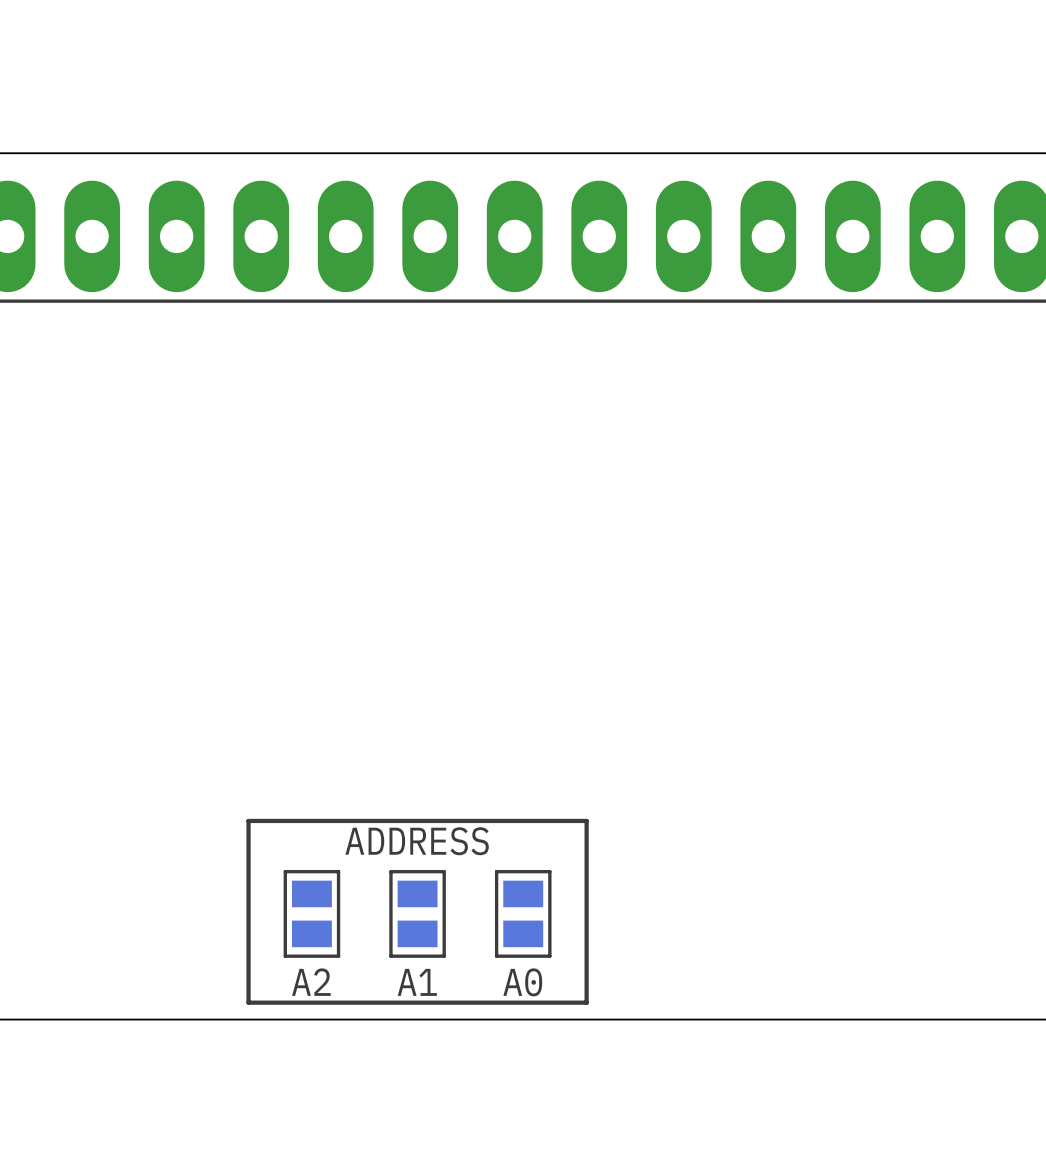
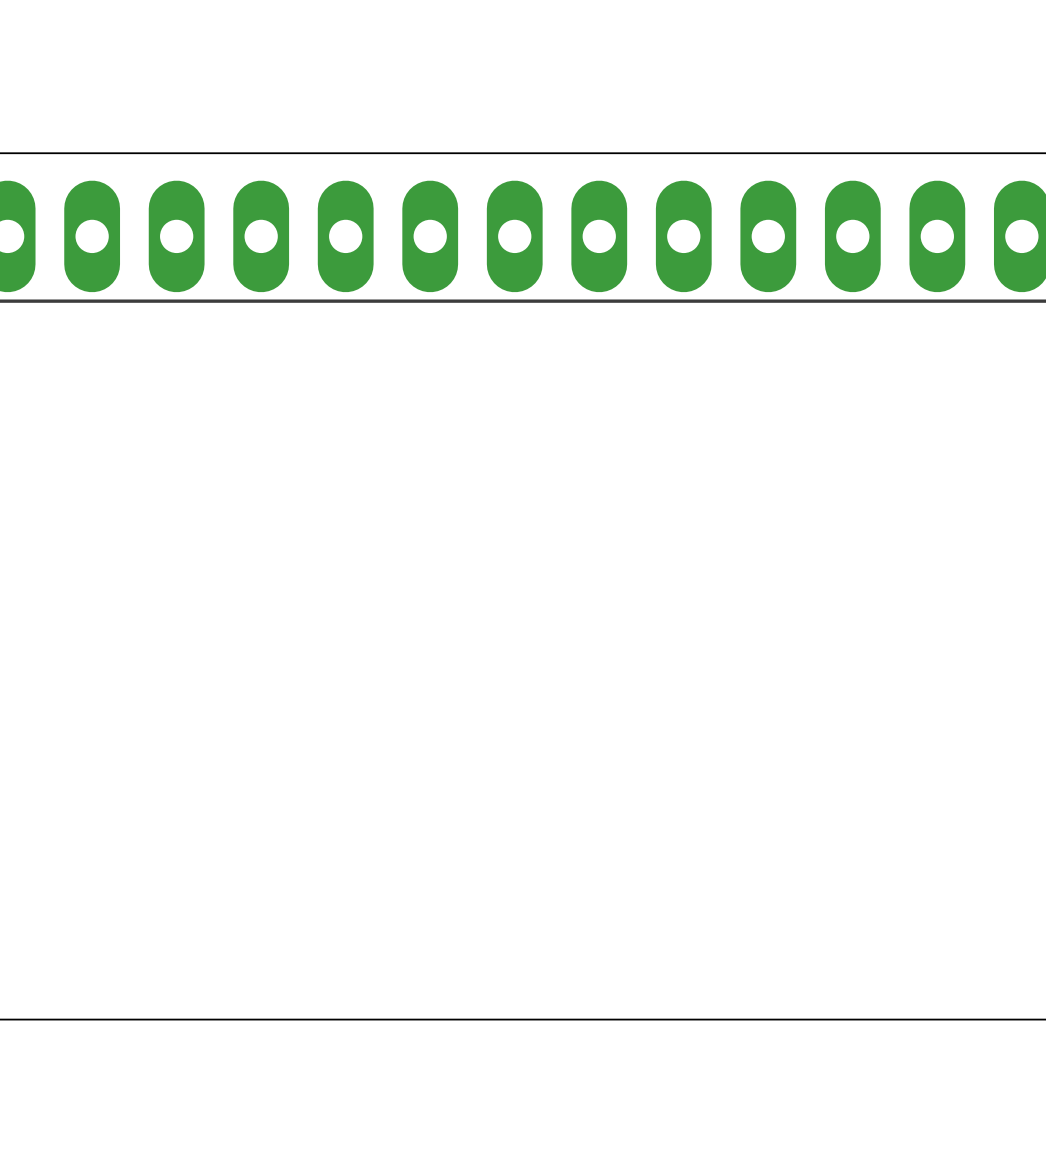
line: (586, 820) (586, 1002) (248, 1002) (248, 820) (586, 820) -> none
text: ADDRESS (417, 841) -> none
part: (311, 913) -> none
part: (417, 913) -> none
part: (523, 913) -> none
text: A2 (311, 982) -> none
text: A1 (417, 982) -> none
text: A0 (522, 982) -> none

